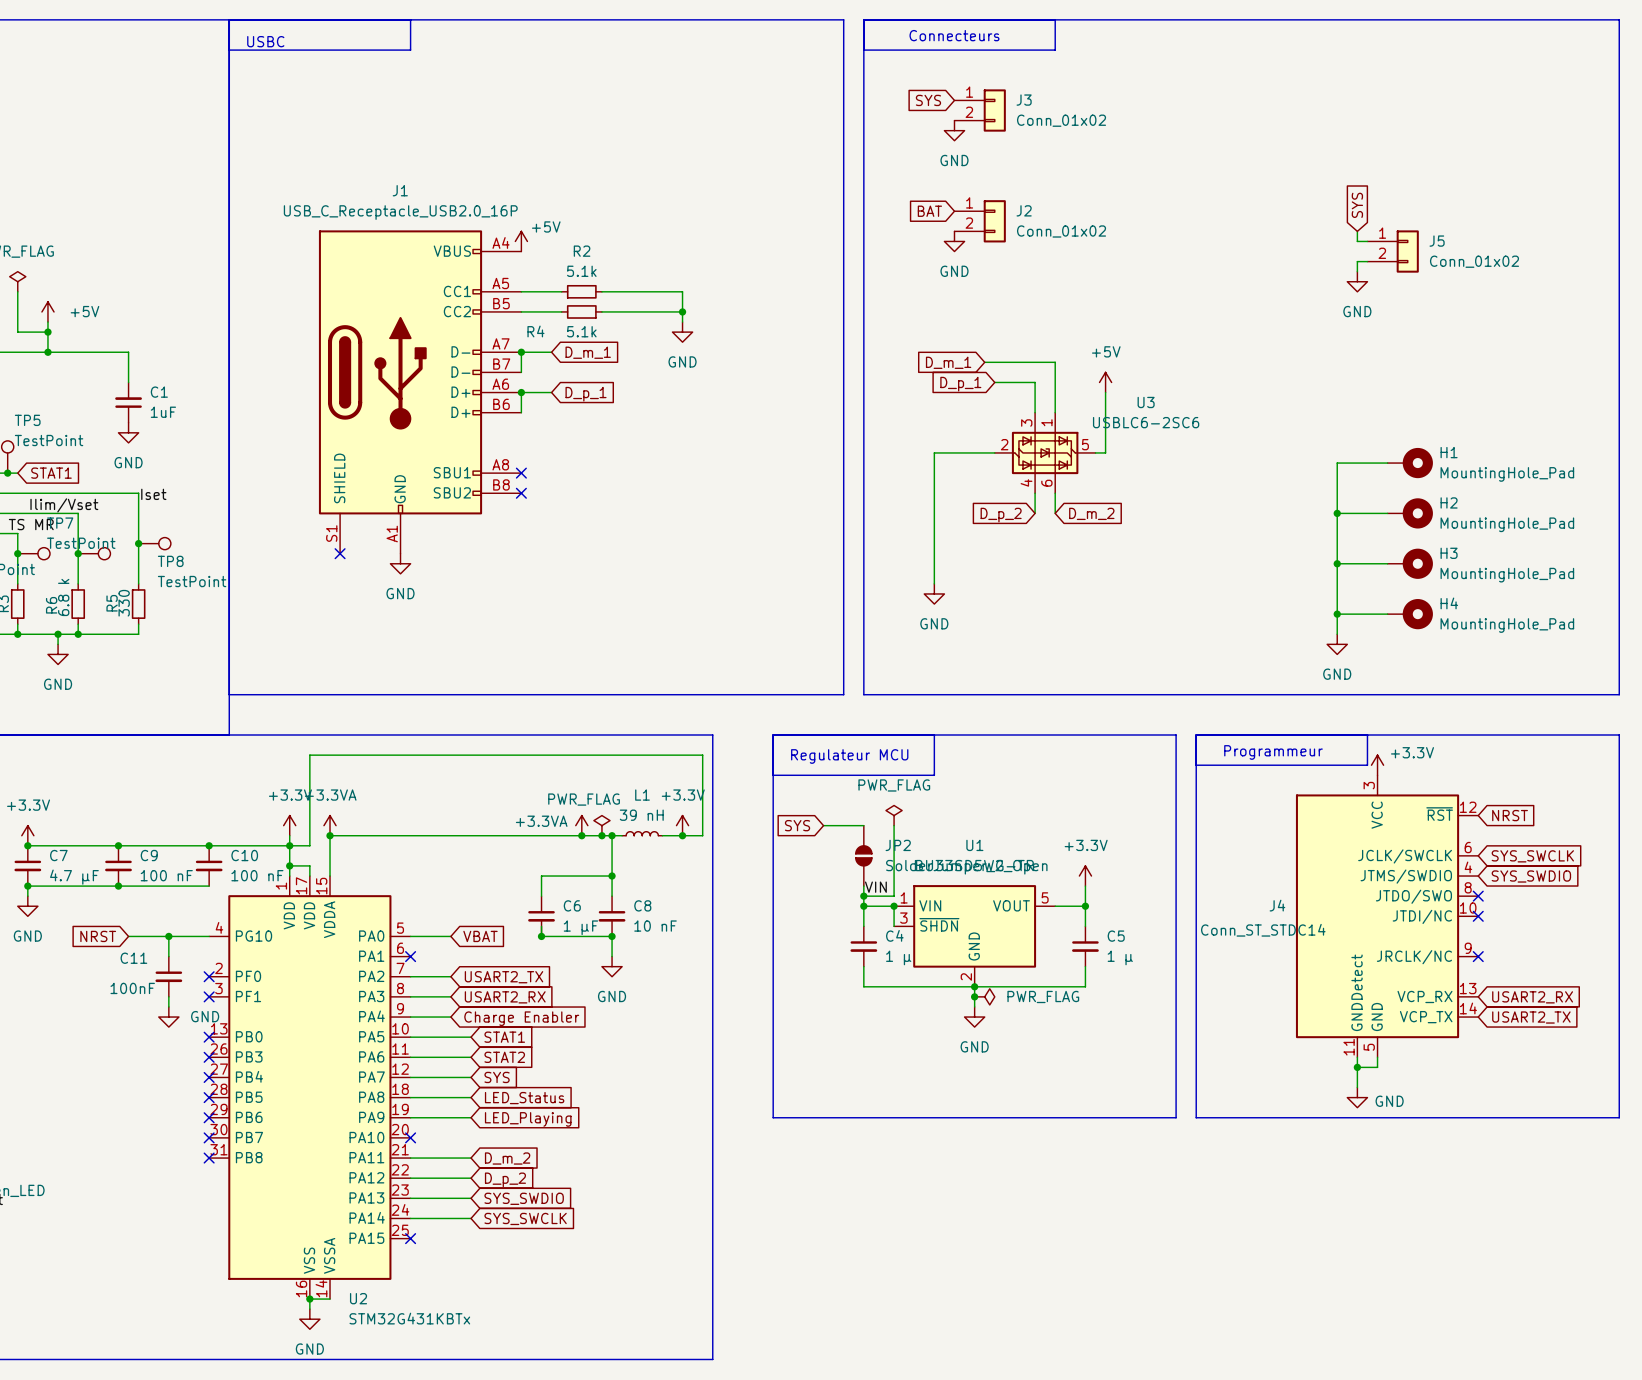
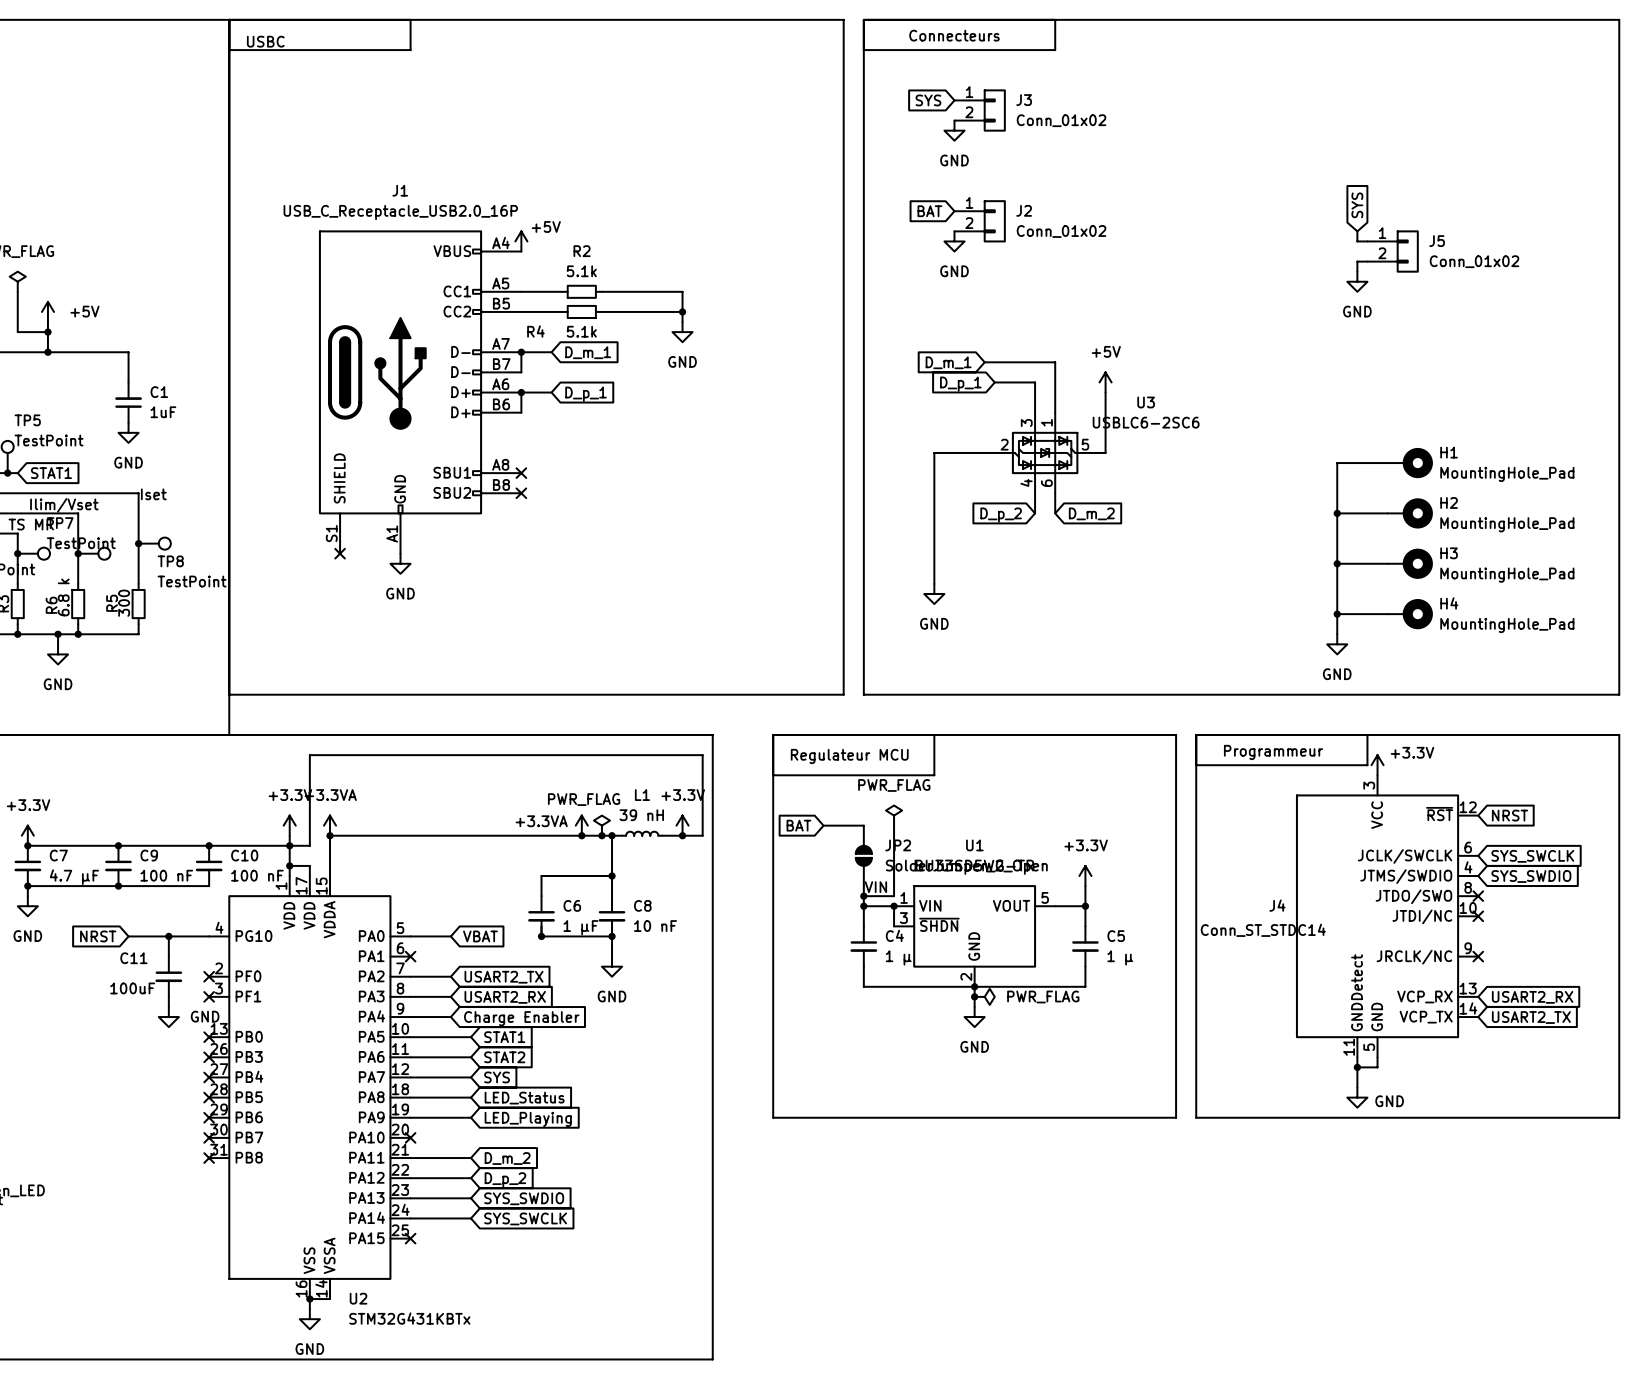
R5 value: 330 (124, 603) -> 300 (124, 603)
global label: SYS (797, 825) -> BAT (798, 825)
C11 value: 100nF (132, 988) -> 100uF (132, 988)

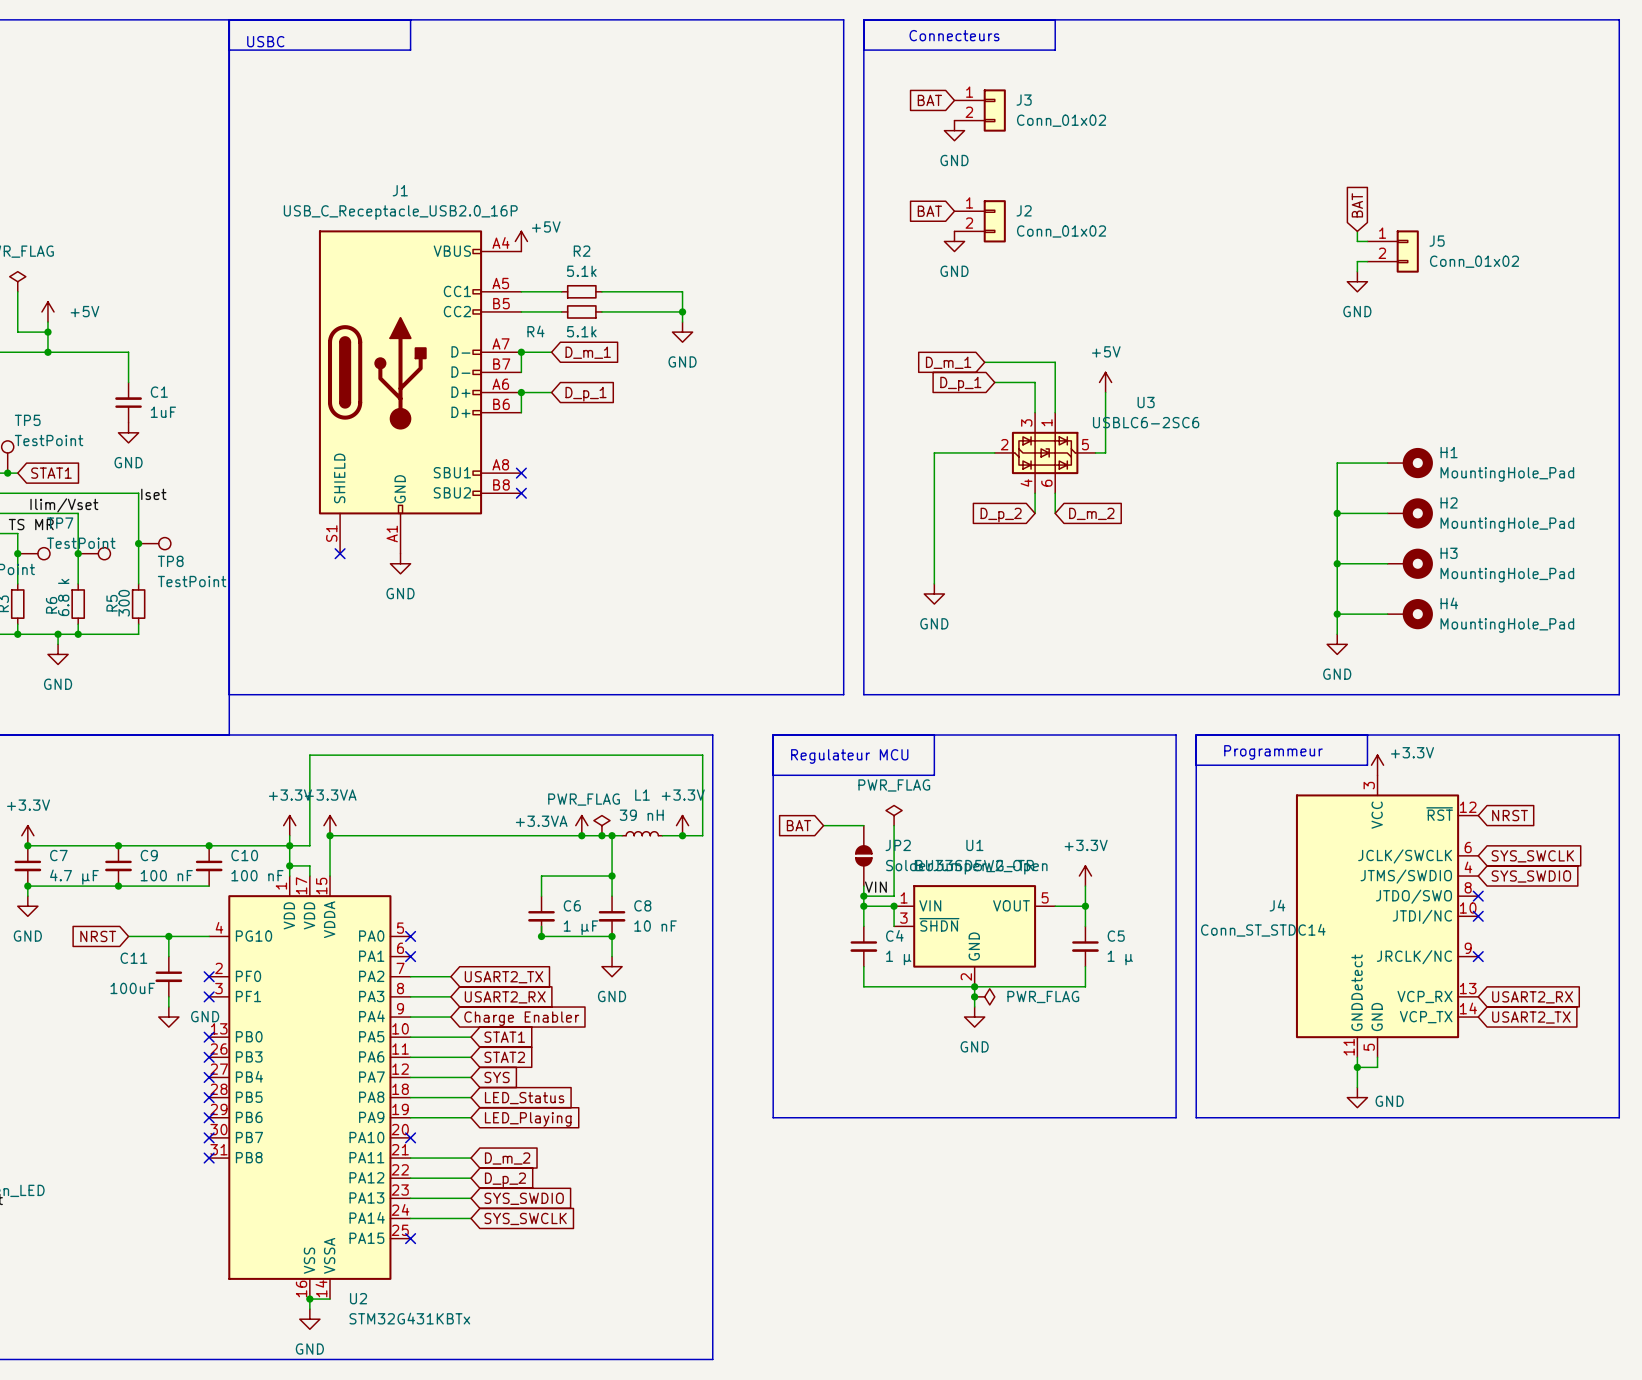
global label: SYS (928, 100) -> BAT (929, 100)
global label: SYS (1357, 205) -> BAT (1357, 205)
wire: (410, 936) (450, 936) -> none
no-connect mark: none -> (410, 936)
global label: VBAT (480, 936) -> none

